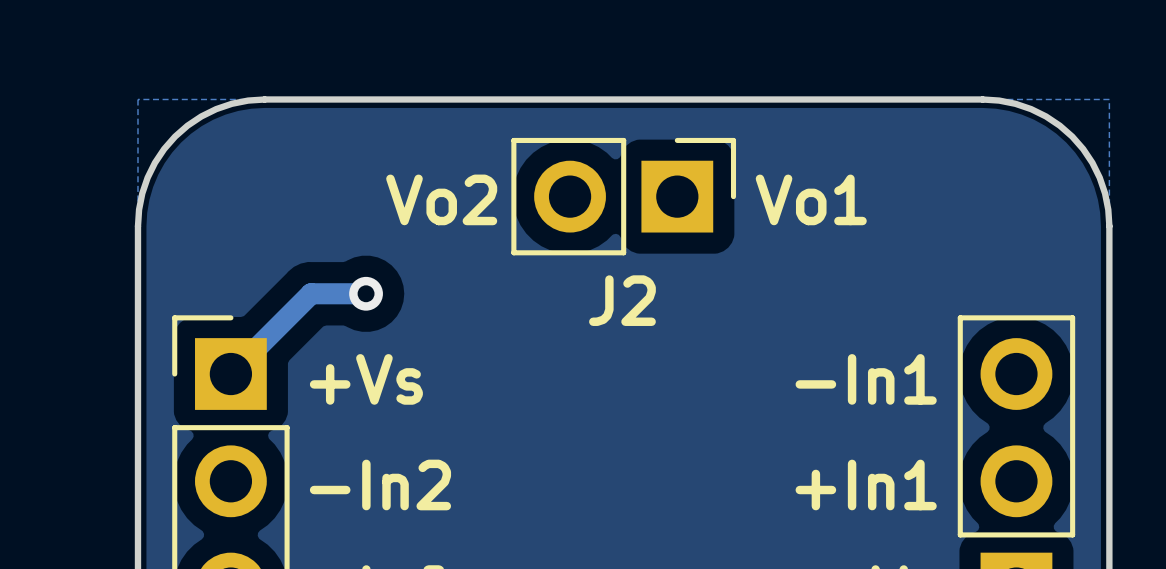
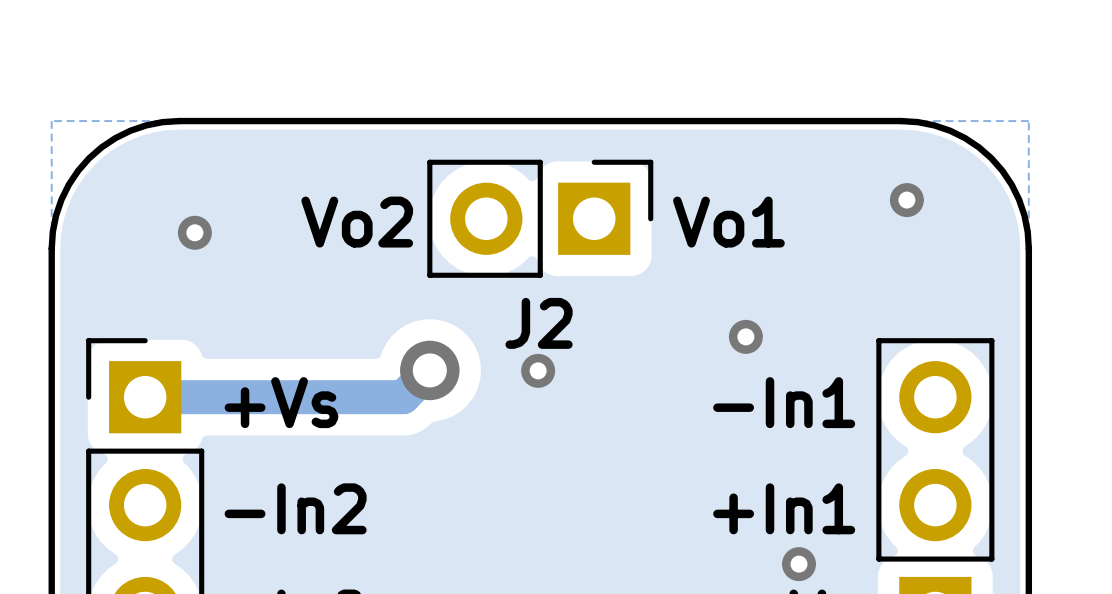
via: none -> (906, 200)
track: (366, 293) (311, 293) (230, 374) -> (429, 370) (403, 397) (145, 397)
via position: (366, 293) -> (194, 232)
via: none -> (745, 336)
via: none -> (429, 370)
via: none -> (538, 370)
via: none -> (798, 564)

